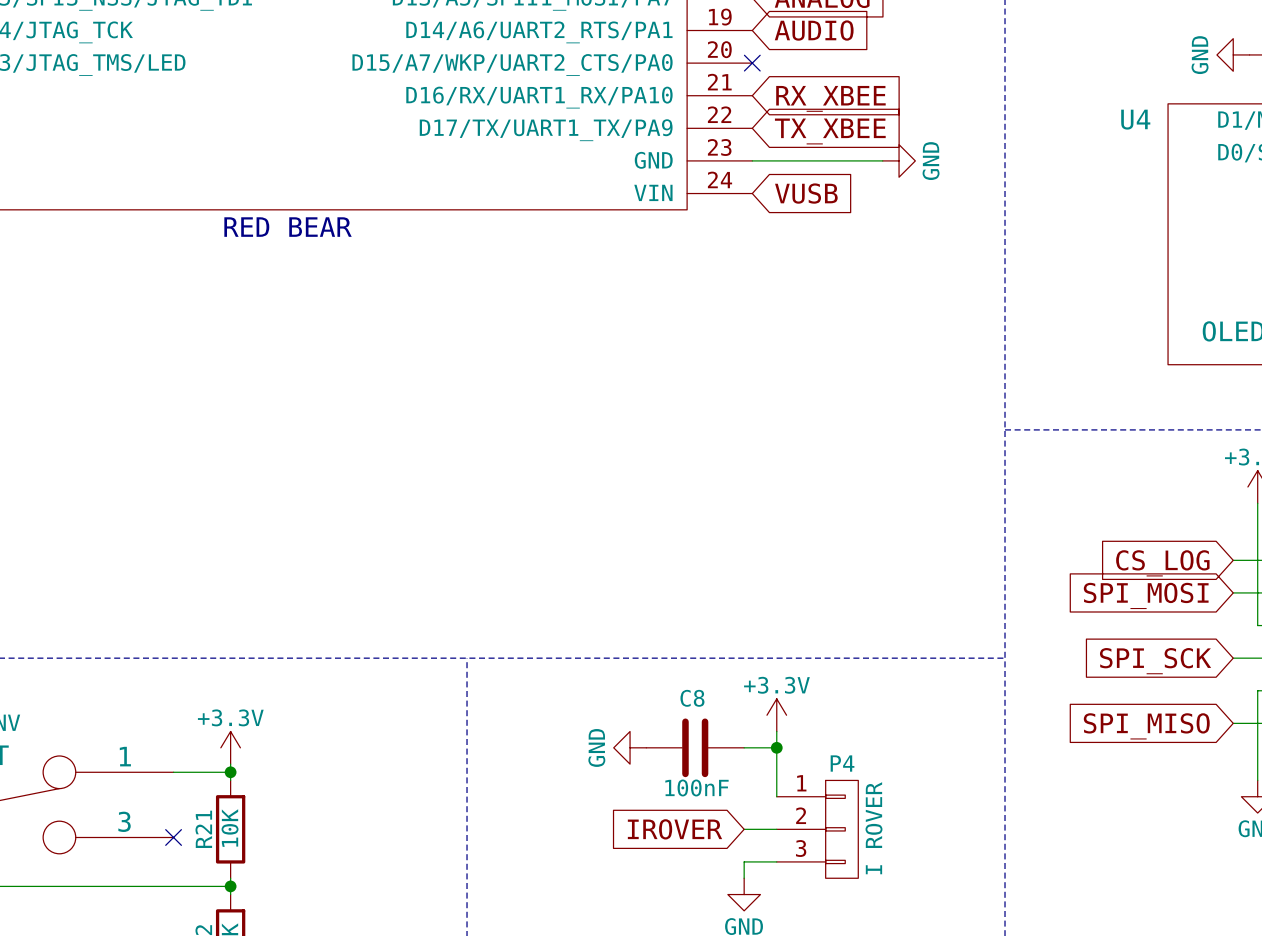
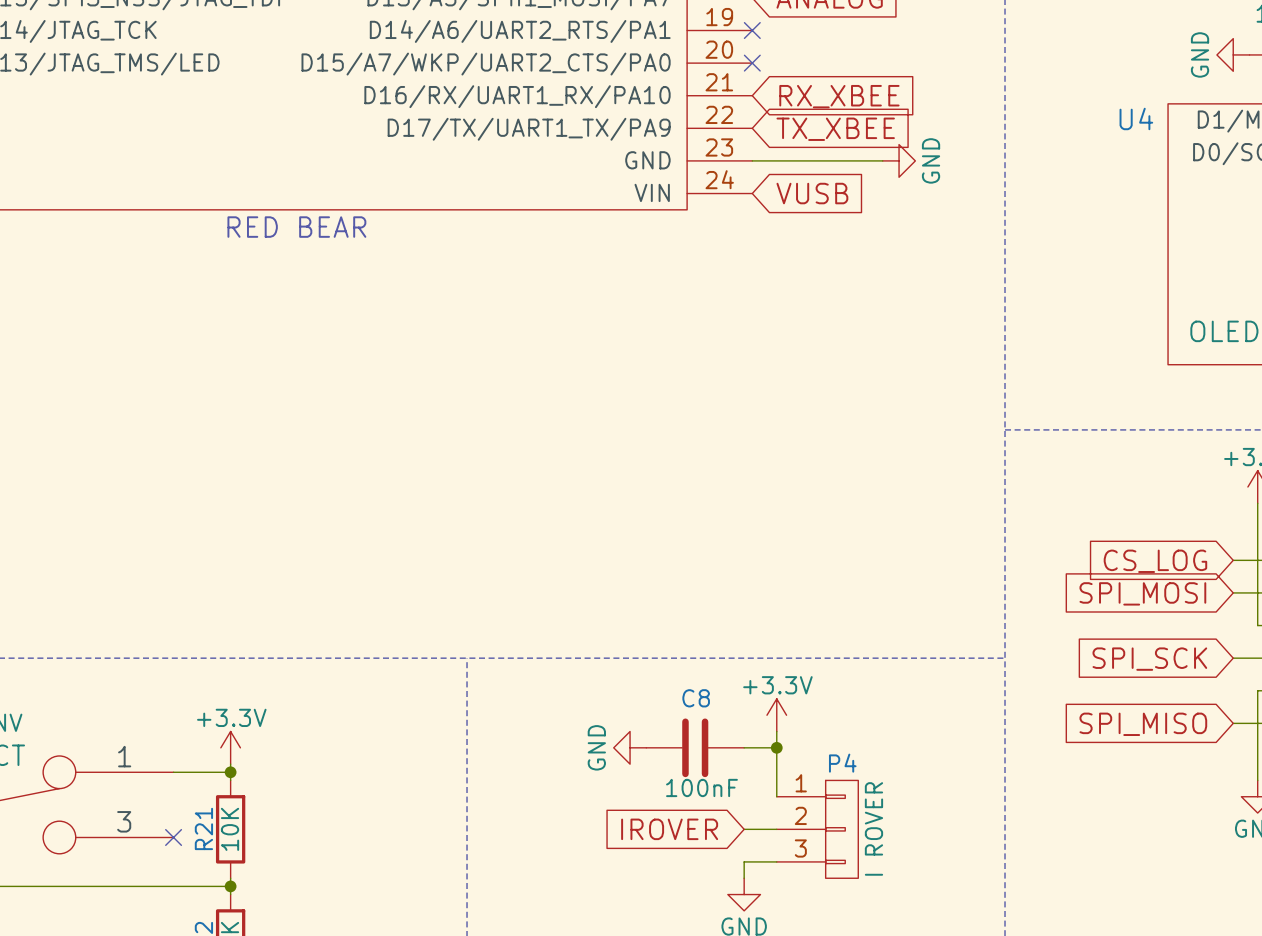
no-connect mark: none -> (752, 30)
global label: AUDIO (814, 30) -> none

